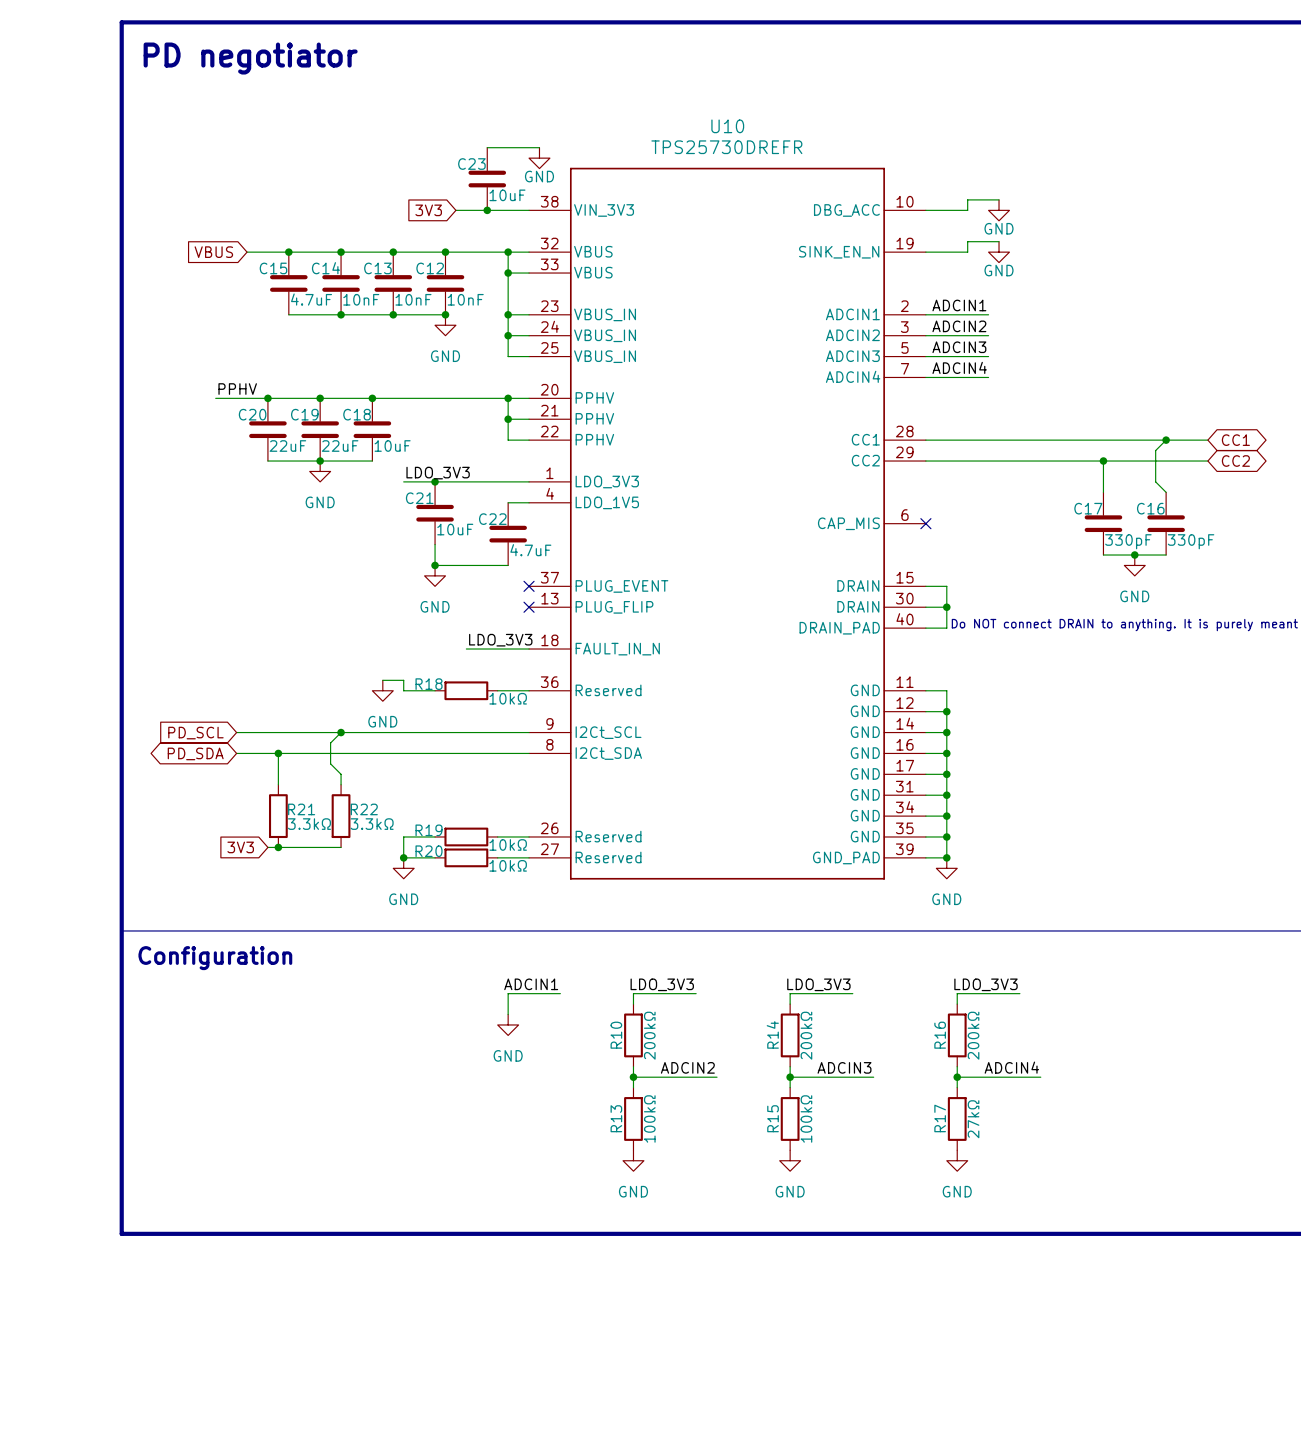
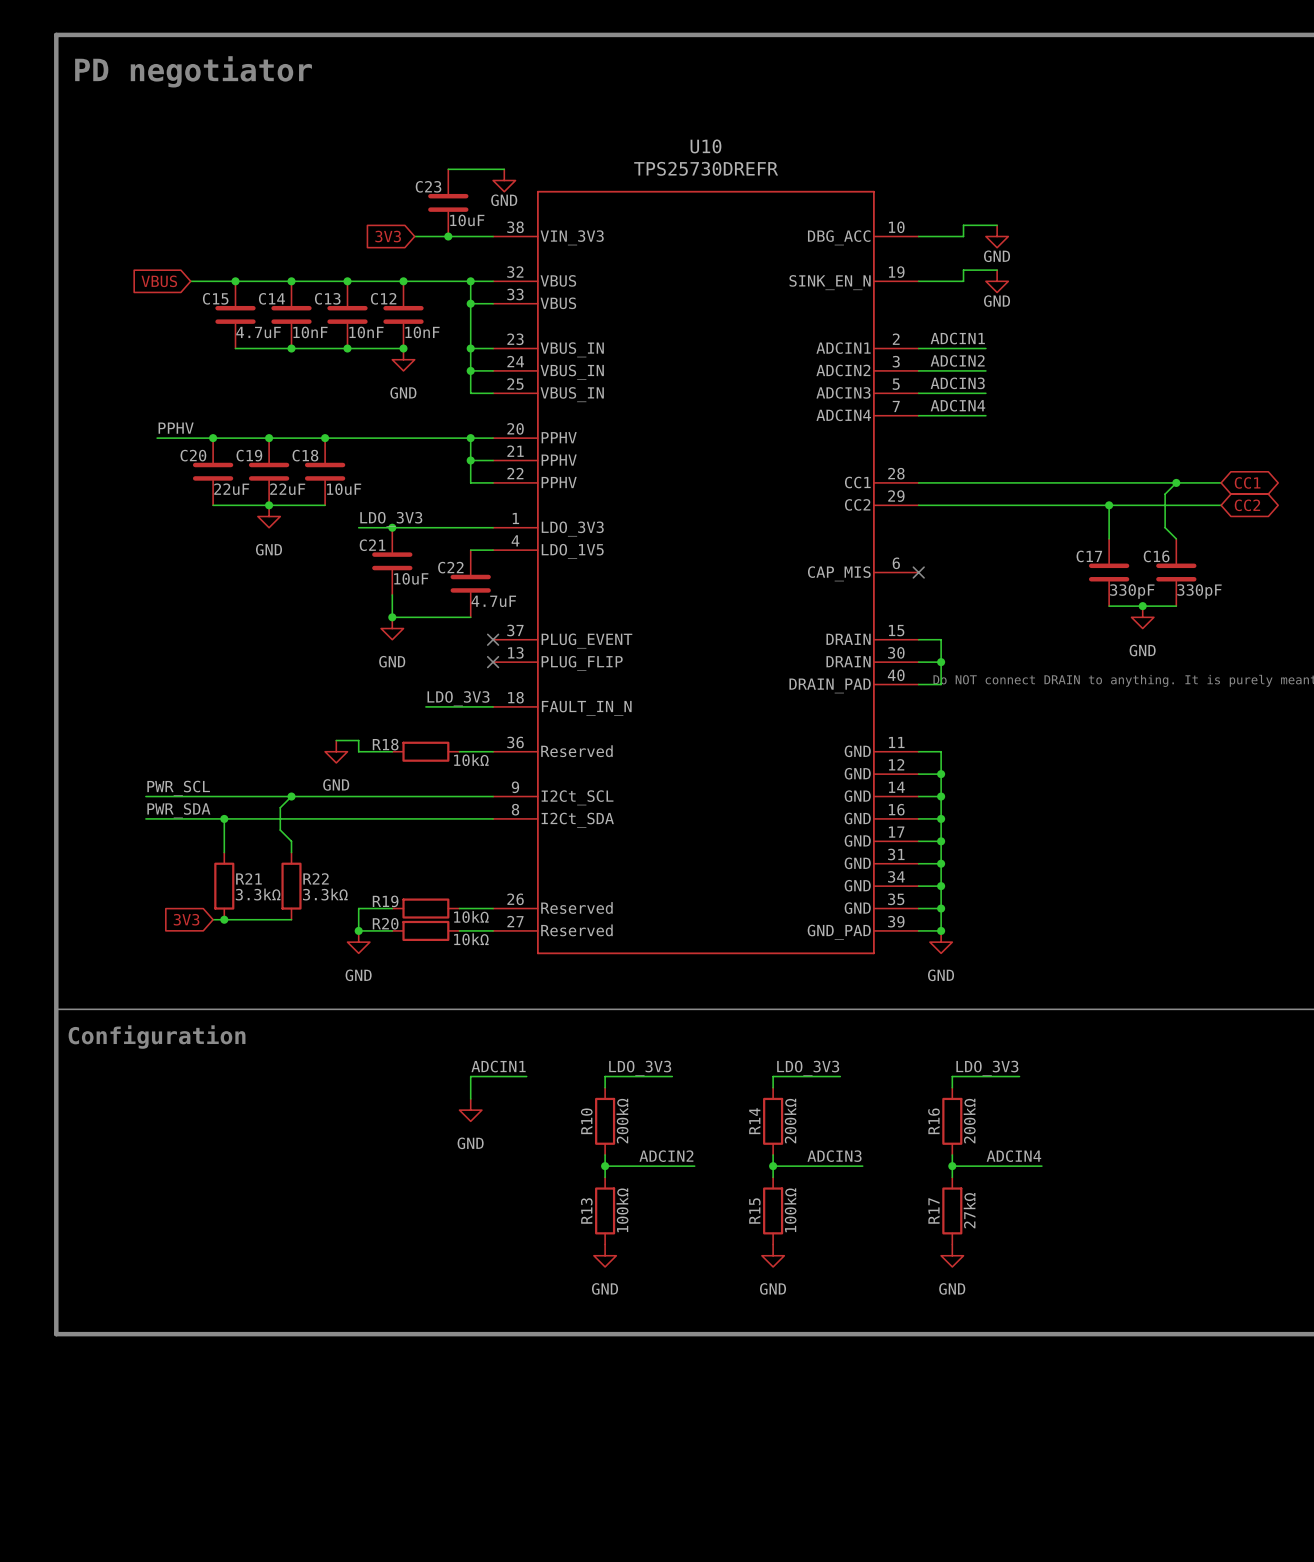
label: none -> PWR_SCL (178, 788)
wire: none -> (145, 796) (179, 796)
global label: PD_SCL (195, 733) -> none
label: none -> PWR_SDA (178, 810)
global label: PD_SDA (195, 753) -> none
wire: none -> (145, 818) (179, 818)

